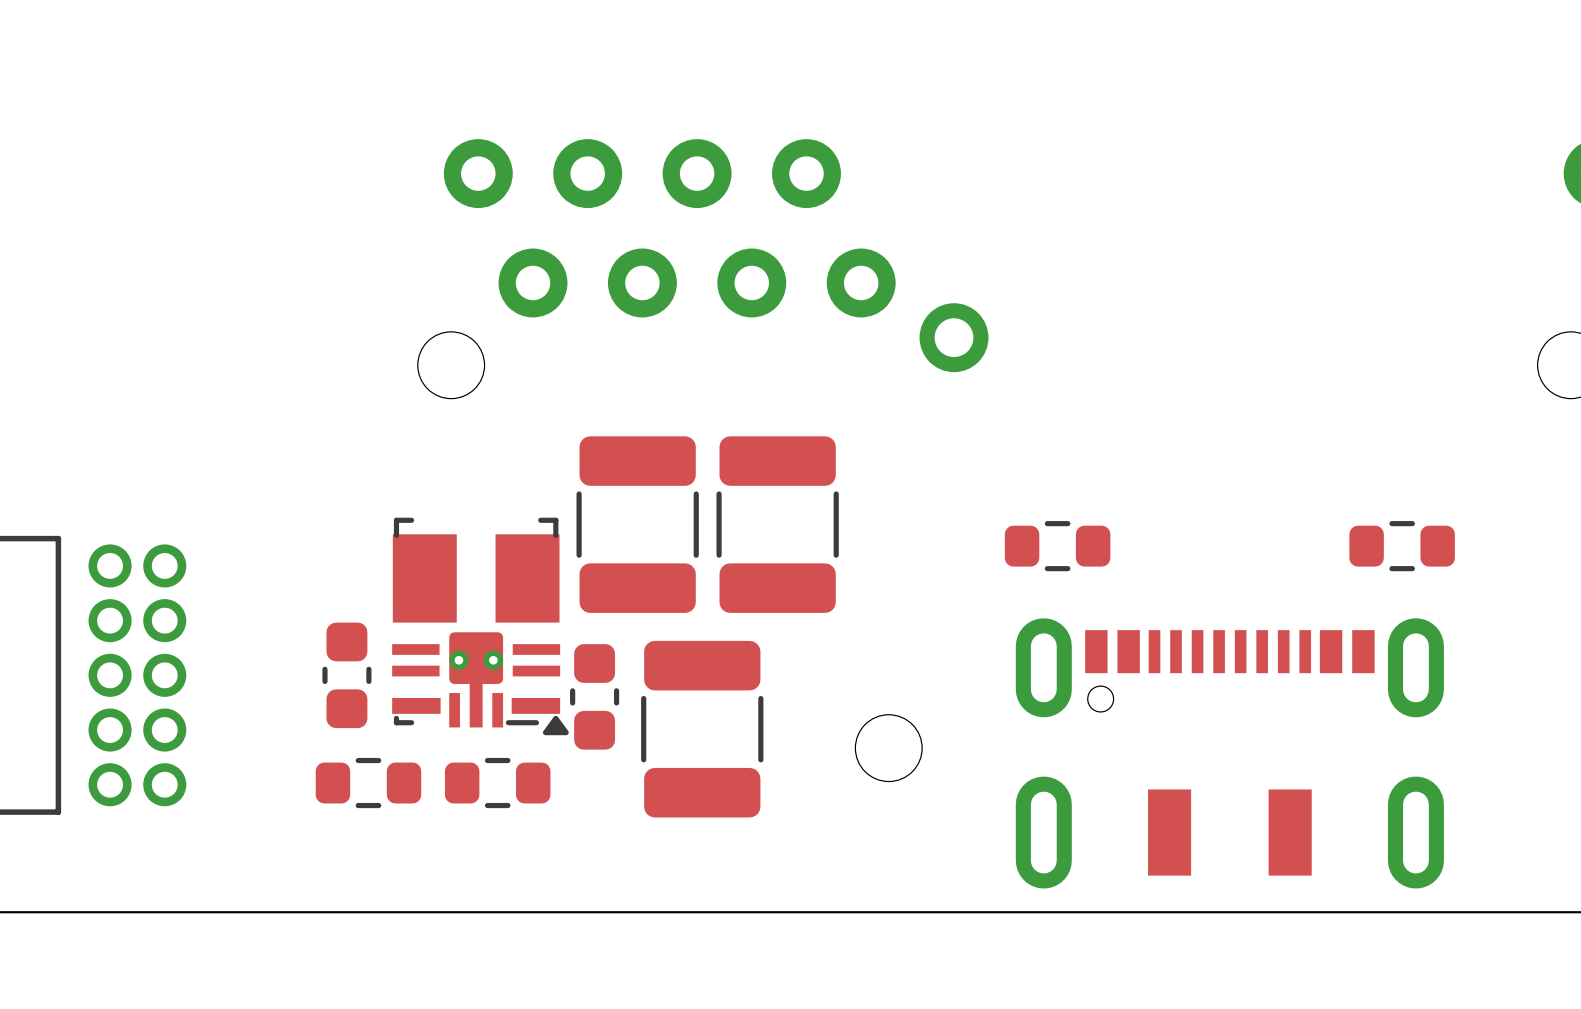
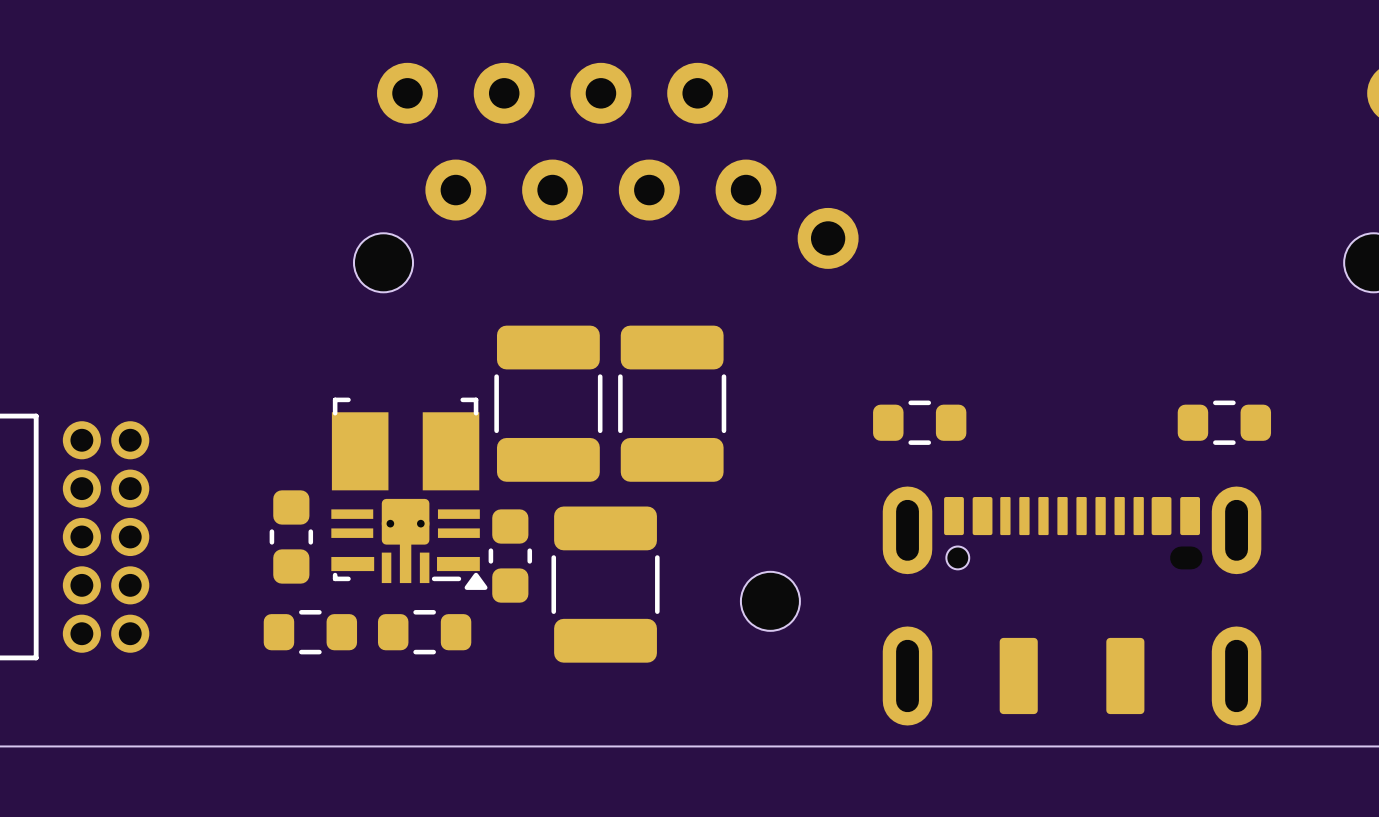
part footprint: [1015, 618, 1444, 889] -> [882, 486, 1262, 726]

